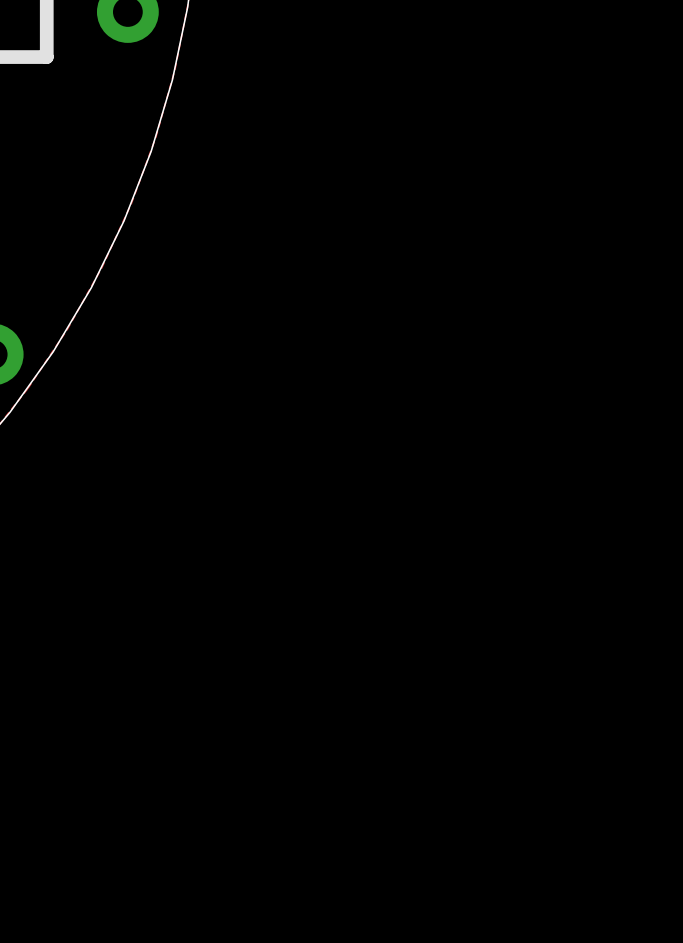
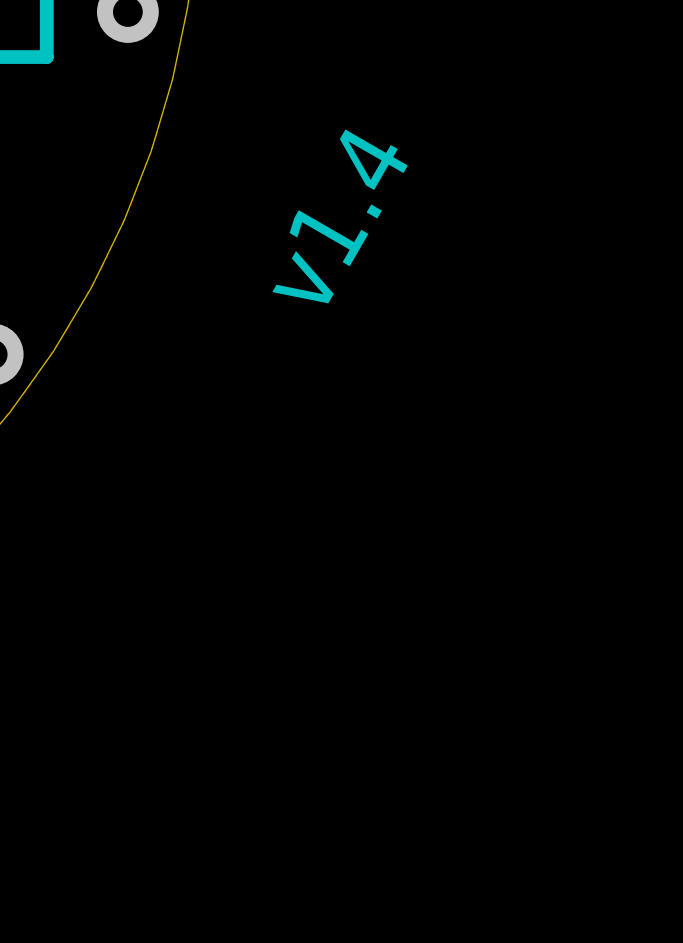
text: none -> v1.4 (340, 216)

